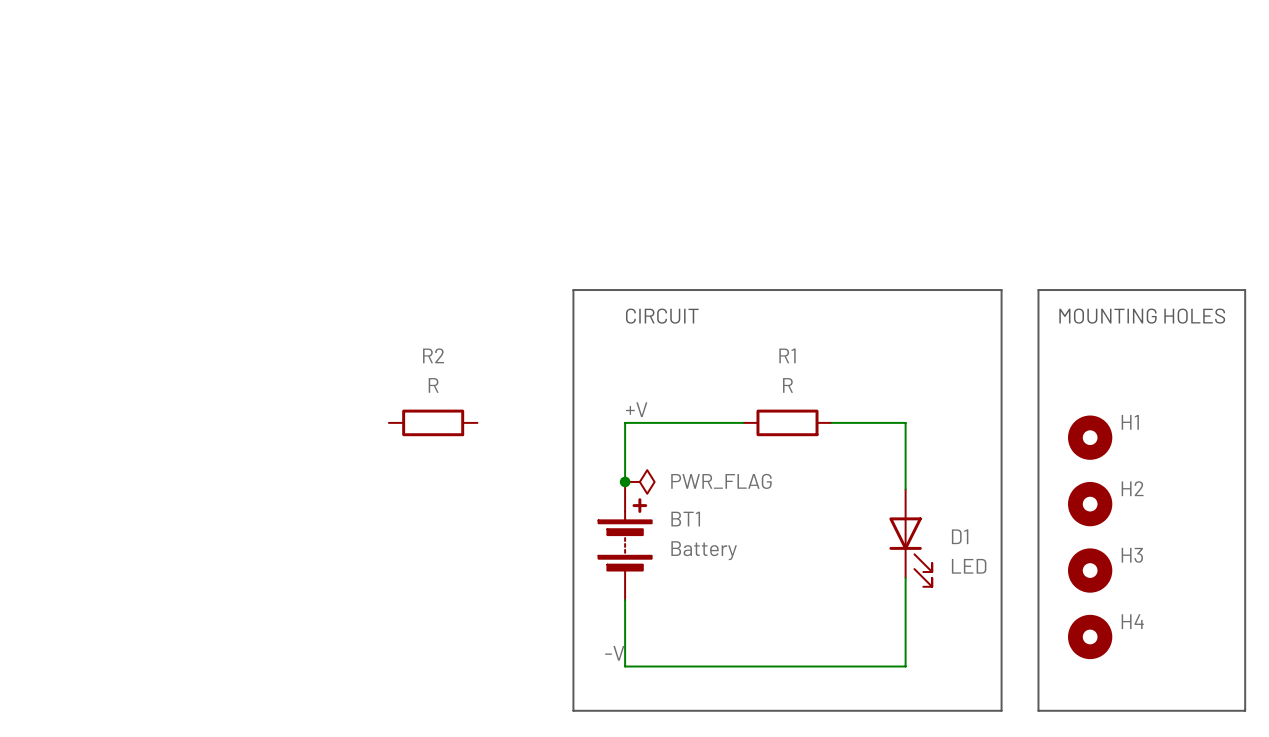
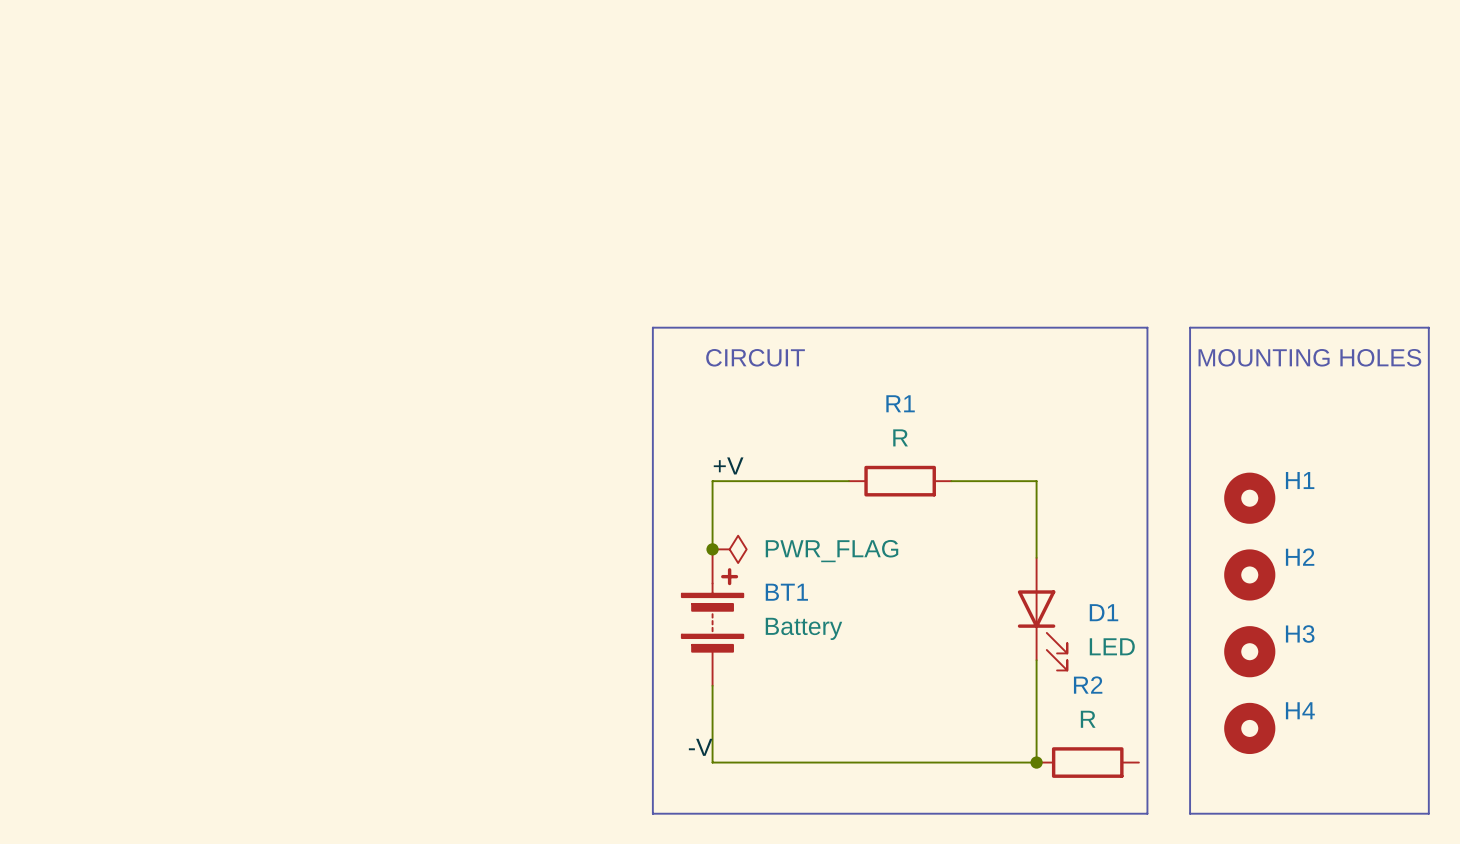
R2 position: (433, 422) -> (1087, 762)
junction: none -> (1036, 762)

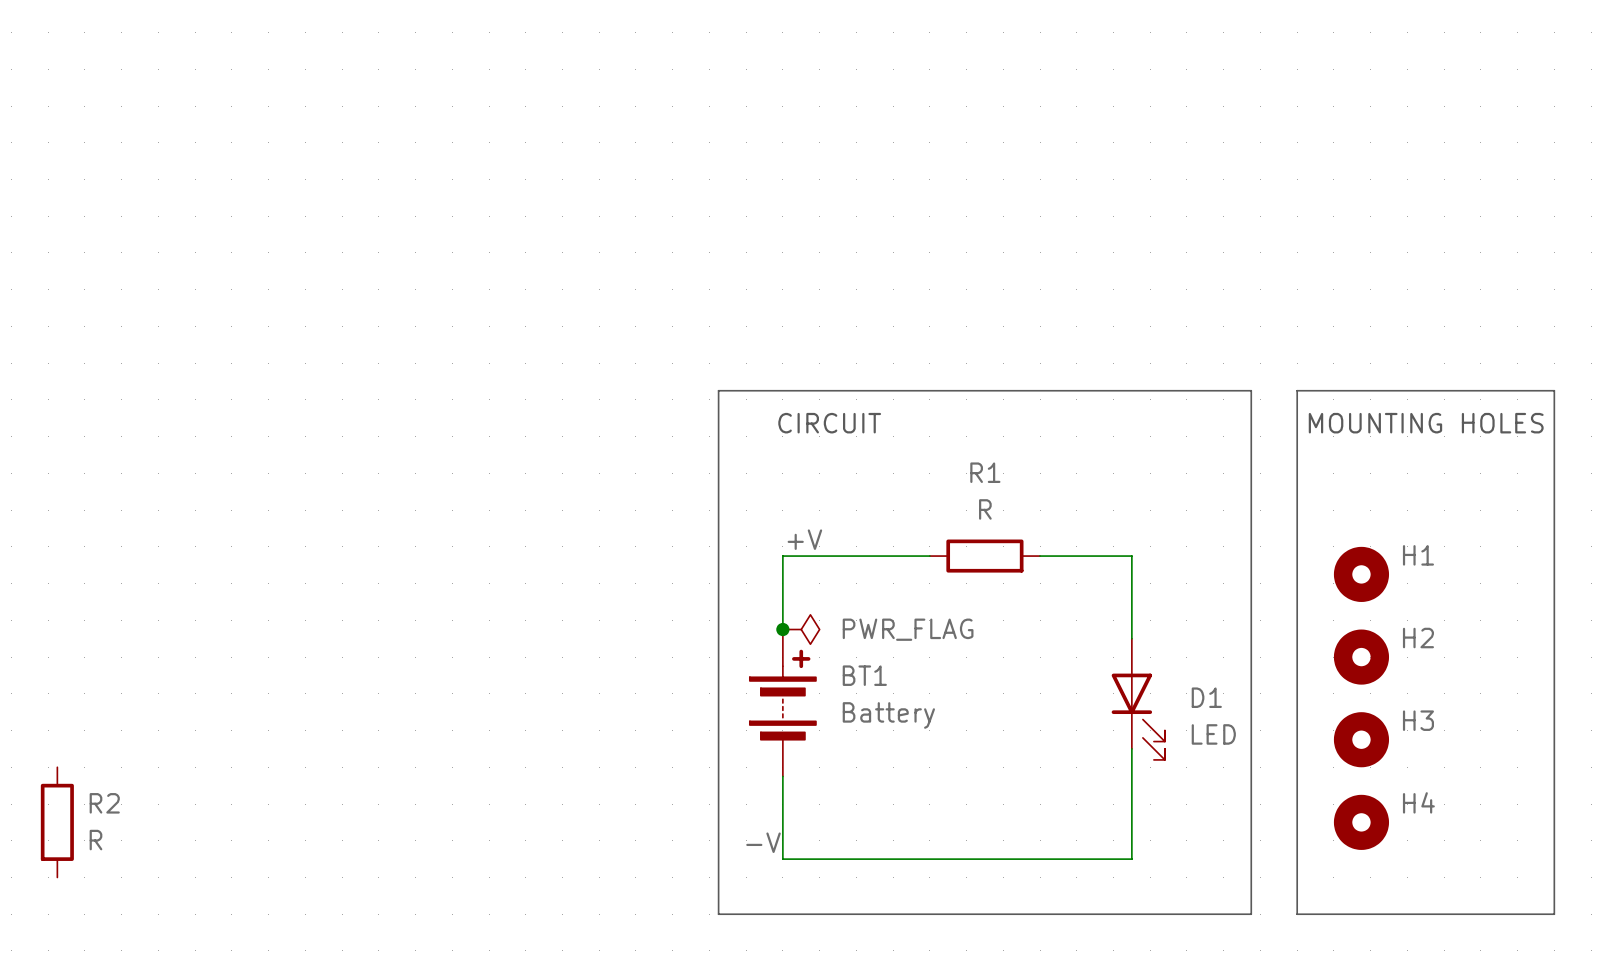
R2 name position: R2 (1088, 685) -> R2 (104, 803)
junction: (1036, 762) -> none
R2 rotation: 0° (1087, 762) -> 90° clockwise (57, 822)
R2 position: (1087, 762) -> (57, 822)

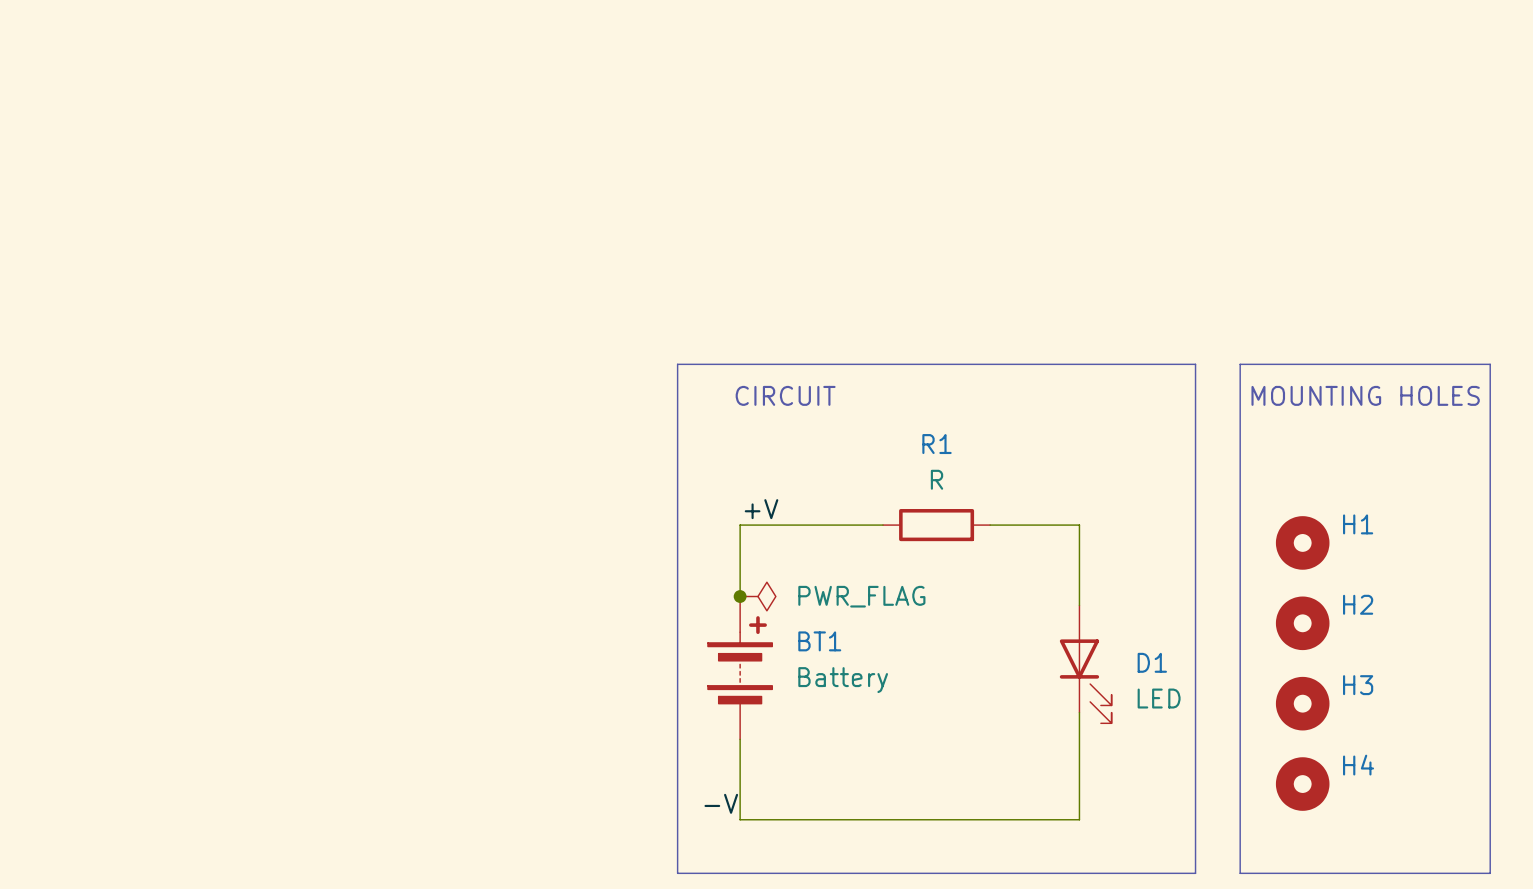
R2: R (57, 822) -> none

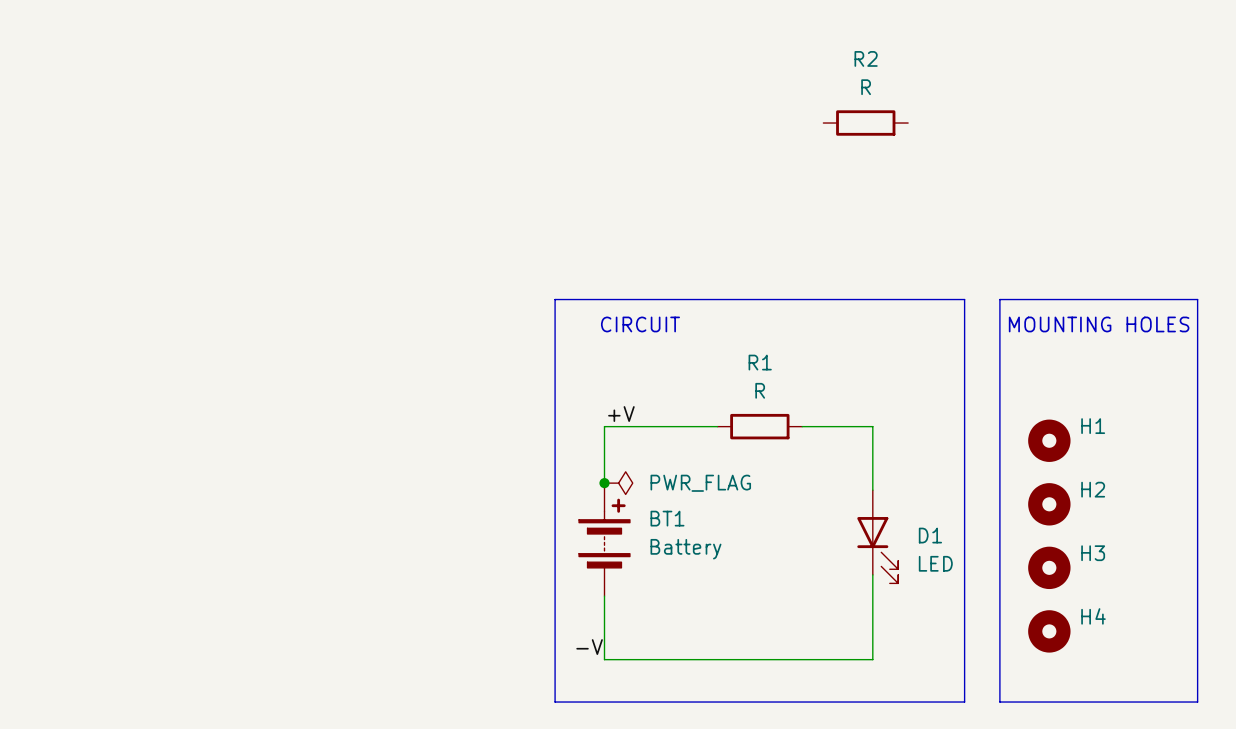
R2: none -> R (865, 123)

